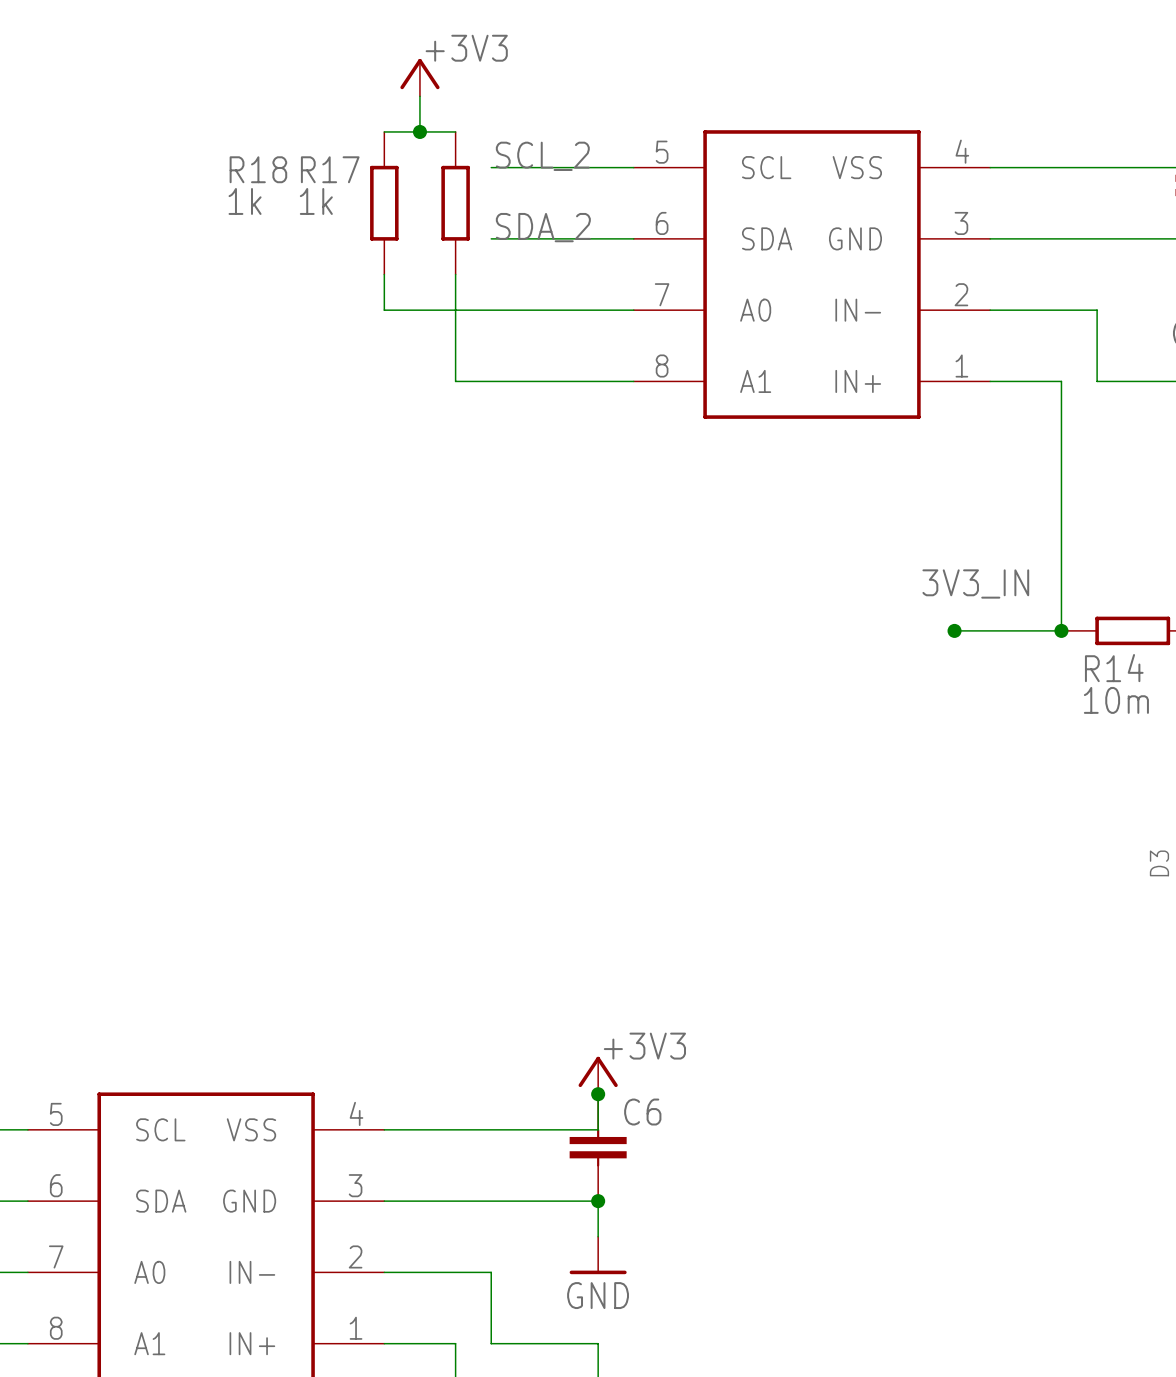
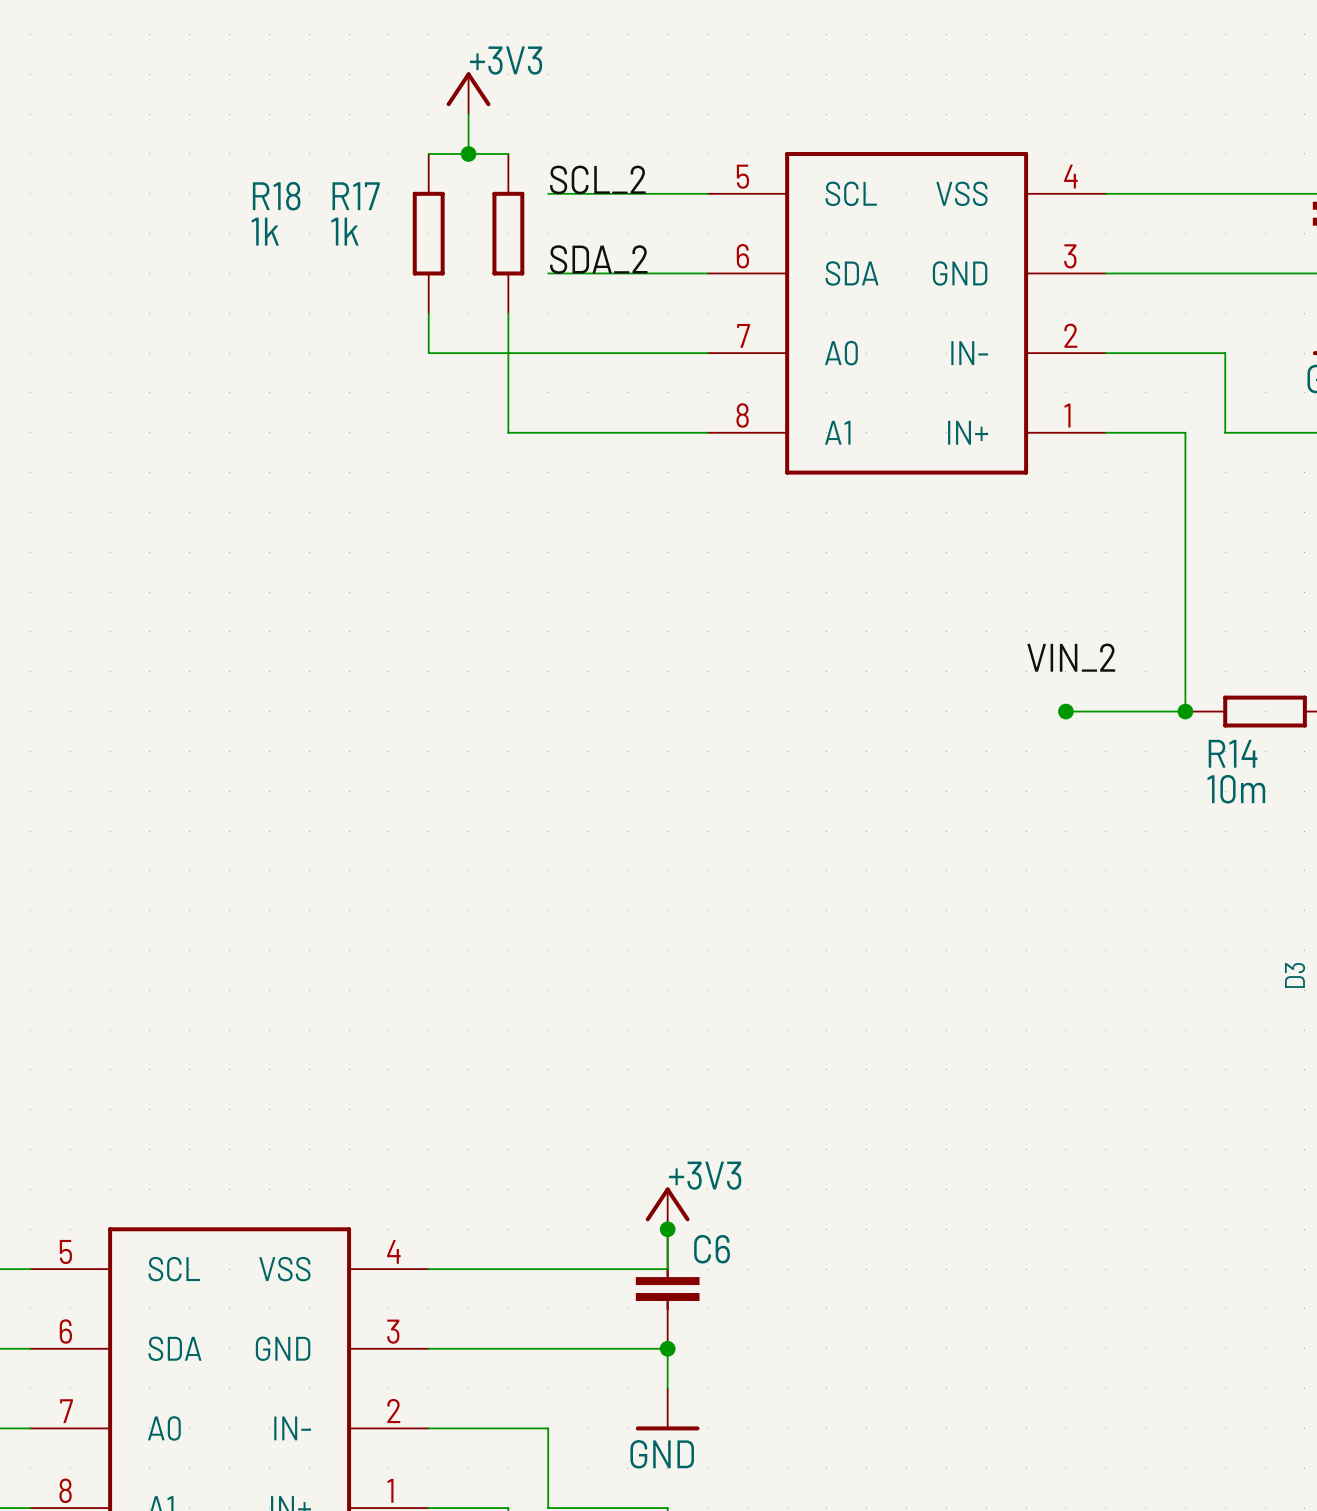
label: 3V3_IN (975, 583) -> VIN_2 (1071, 657)

